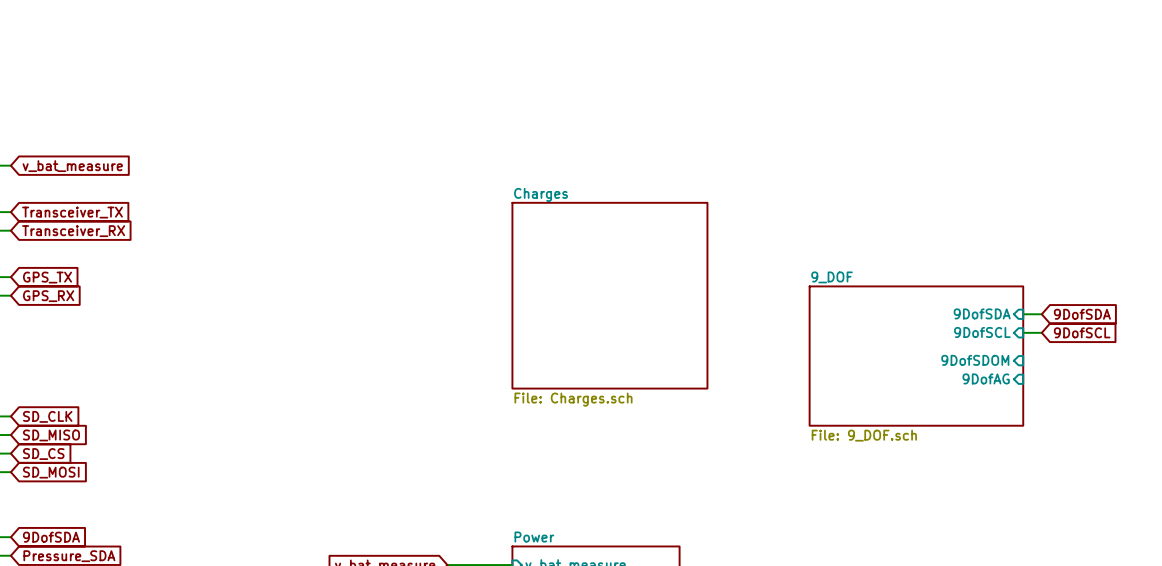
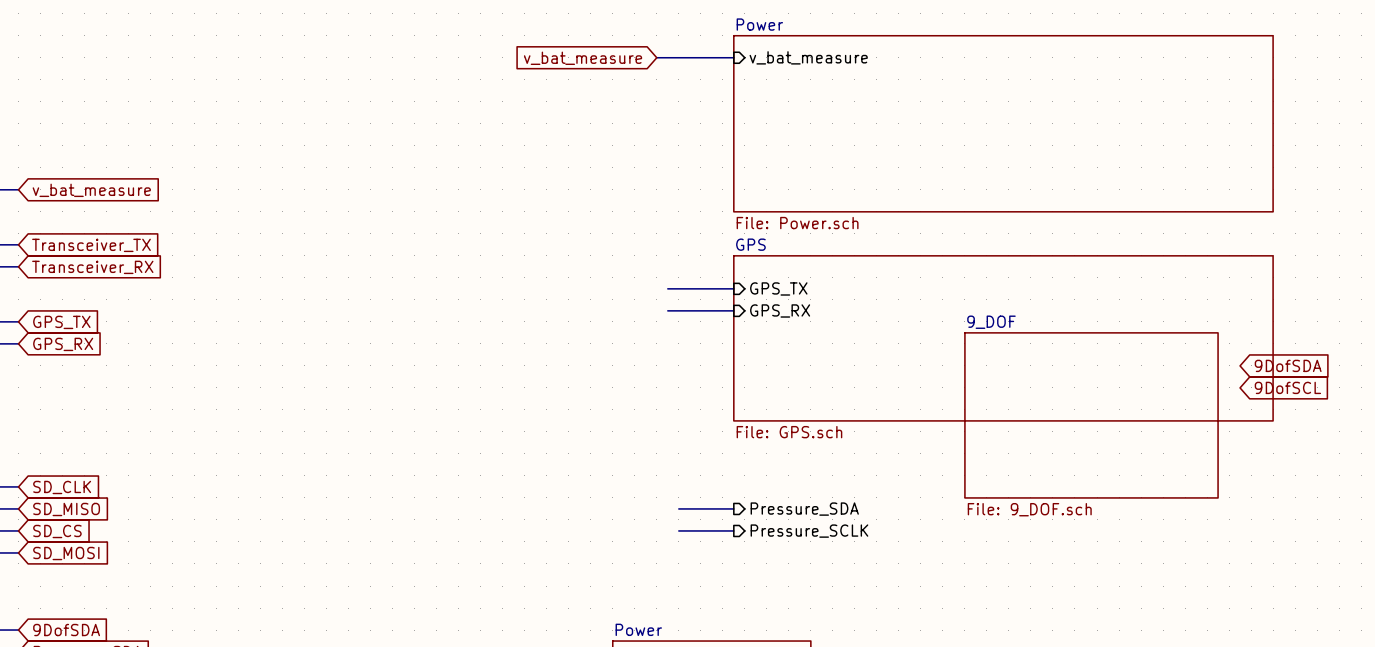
global label: none -> v_bat_measure (583, 58)
wire: none -> (656, 57) (733, 57)
sheet pin: none -> v_bat_measure (808, 57)
sheet Power: none -> File: Power.sch (1003, 123)
wire: none -> (667, 288) (733, 288)
sheet pin: none -> GPS_TX (778, 288)
wire: none -> (667, 310) (733, 310)
sheet pin: none -> GPS_RX (780, 310)
sheet GPS: none -> File: GPS.sch (1003, 338)
sheet Charges: File: Charges.sch (609, 295) -> none
sheet pin: 9DofSDA (982, 313) -> none
wire: (1023, 314) (1041, 314) -> none
sheet pin: 9DofSCL (982, 332) -> none
wire: (1023, 332) (1041, 332) -> none
sheet pin: 9DofSDOM (975, 360) -> none
sheet pin: 9DofAG (986, 378) -> none
wire: none -> (678, 508) (733, 508)
sheet pin: none -> Pressure_SDA (804, 509)
wire: none -> (678, 530) (733, 530)
sheet pin: none -> Pressure_SCLK (809, 531)

